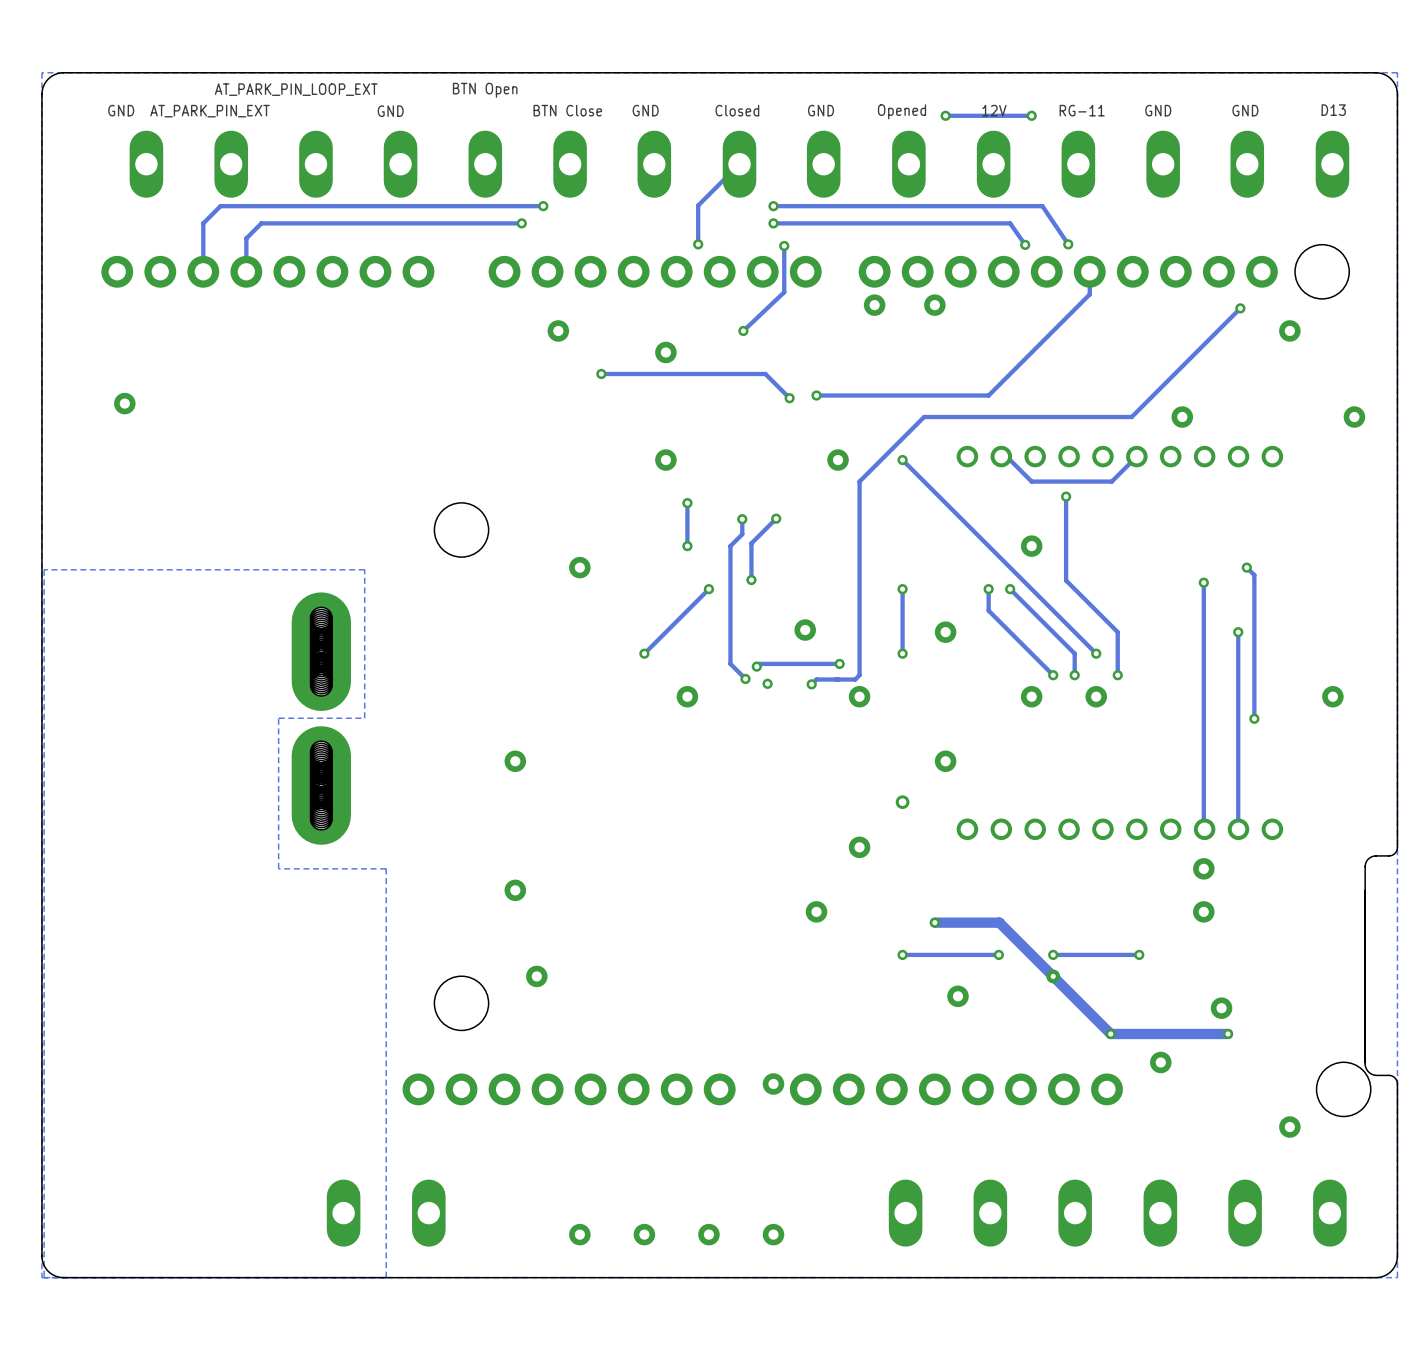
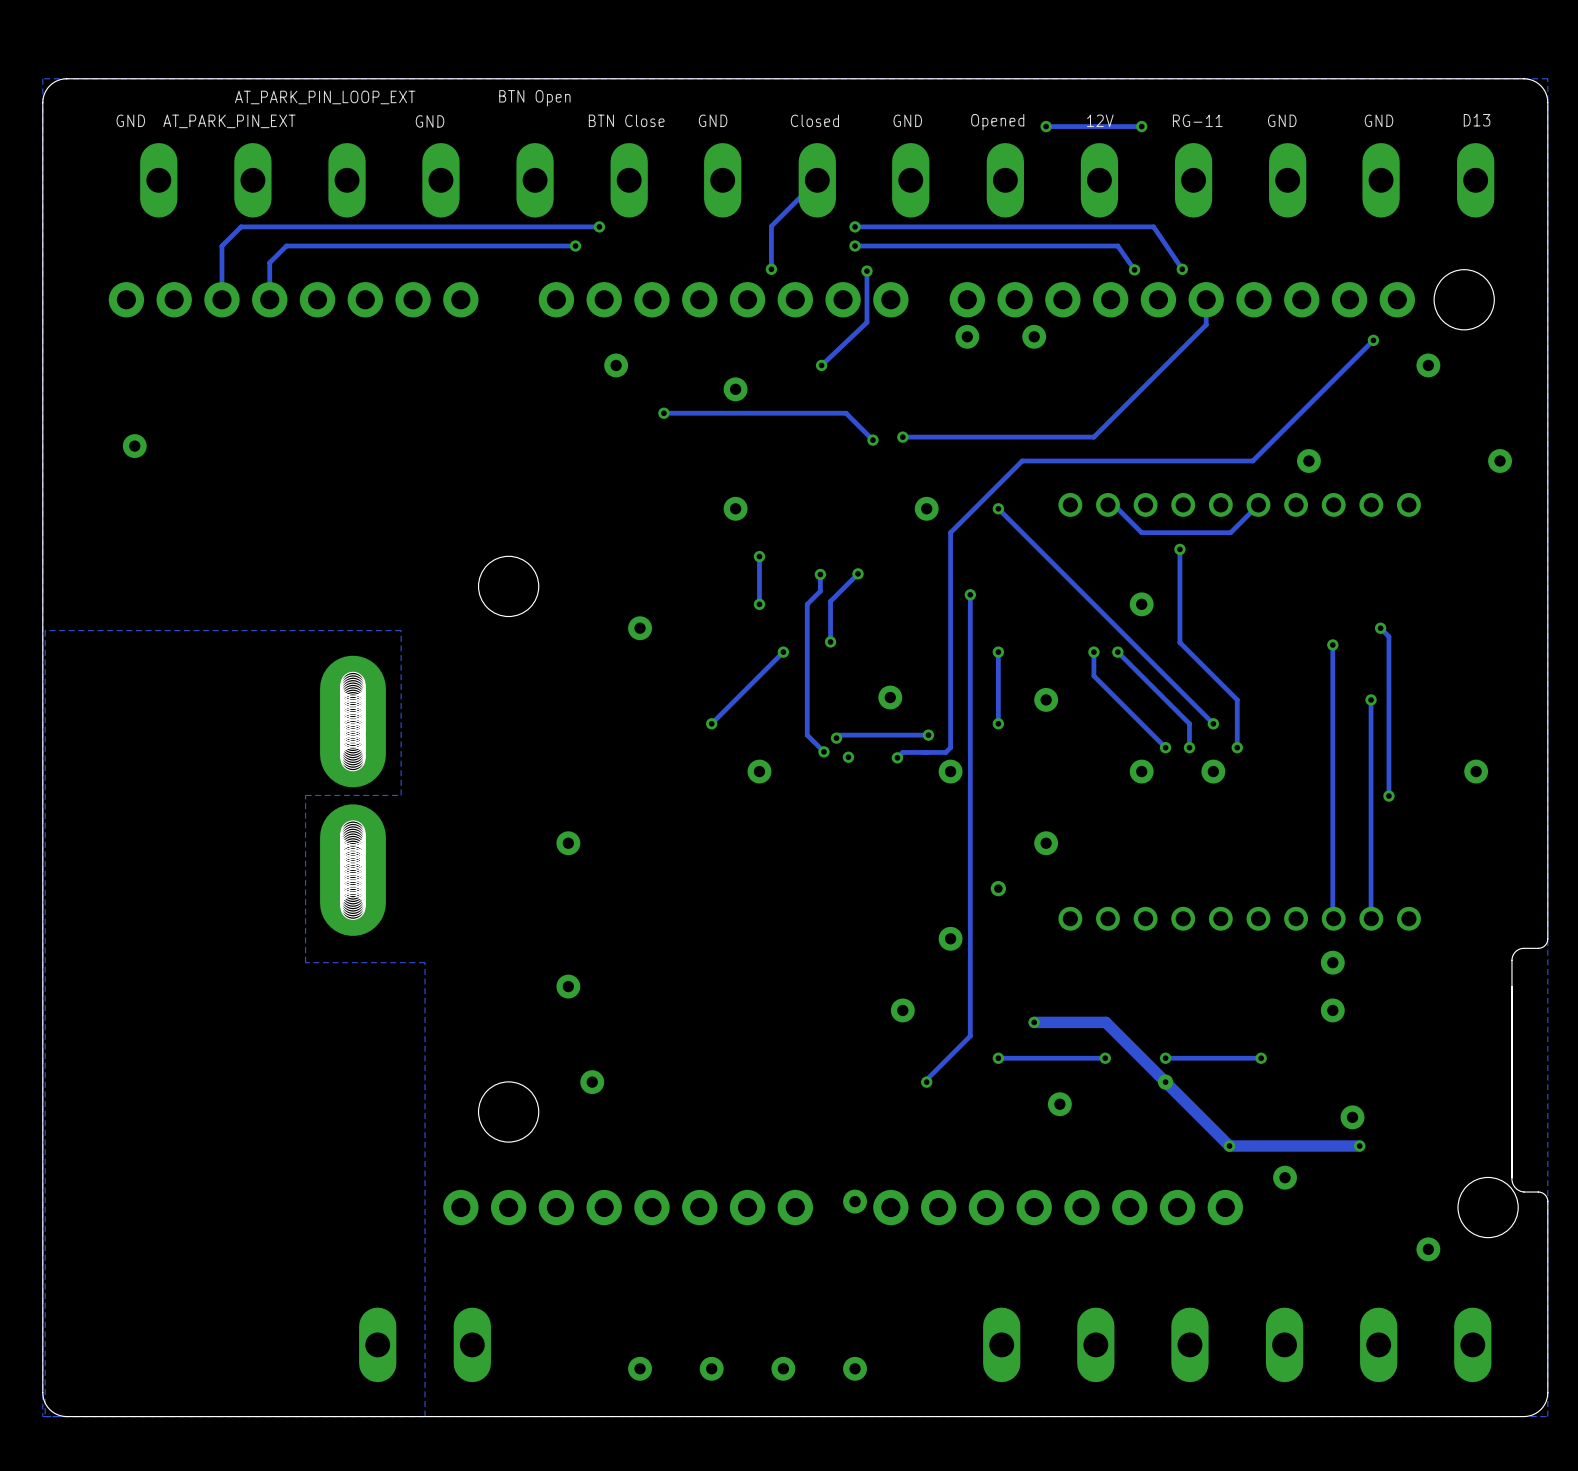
track: none -> (970, 594) (970, 1036) (926, 1079) (926, 1082)
via: none -> (970, 594)
via: none -> (926, 1082)

